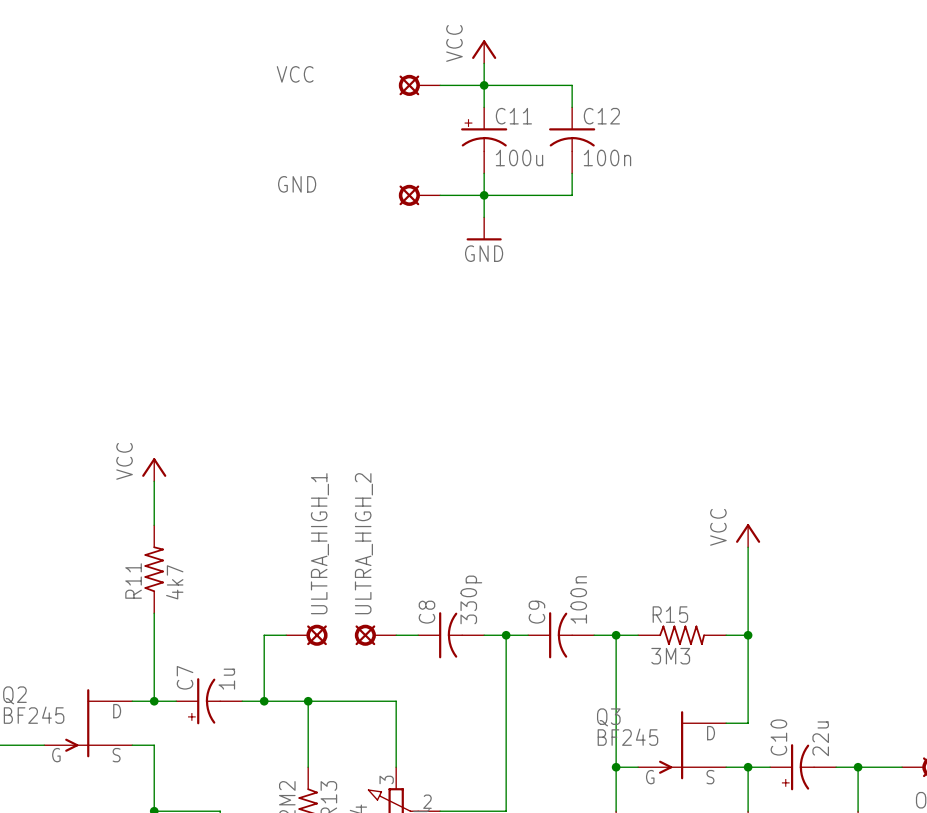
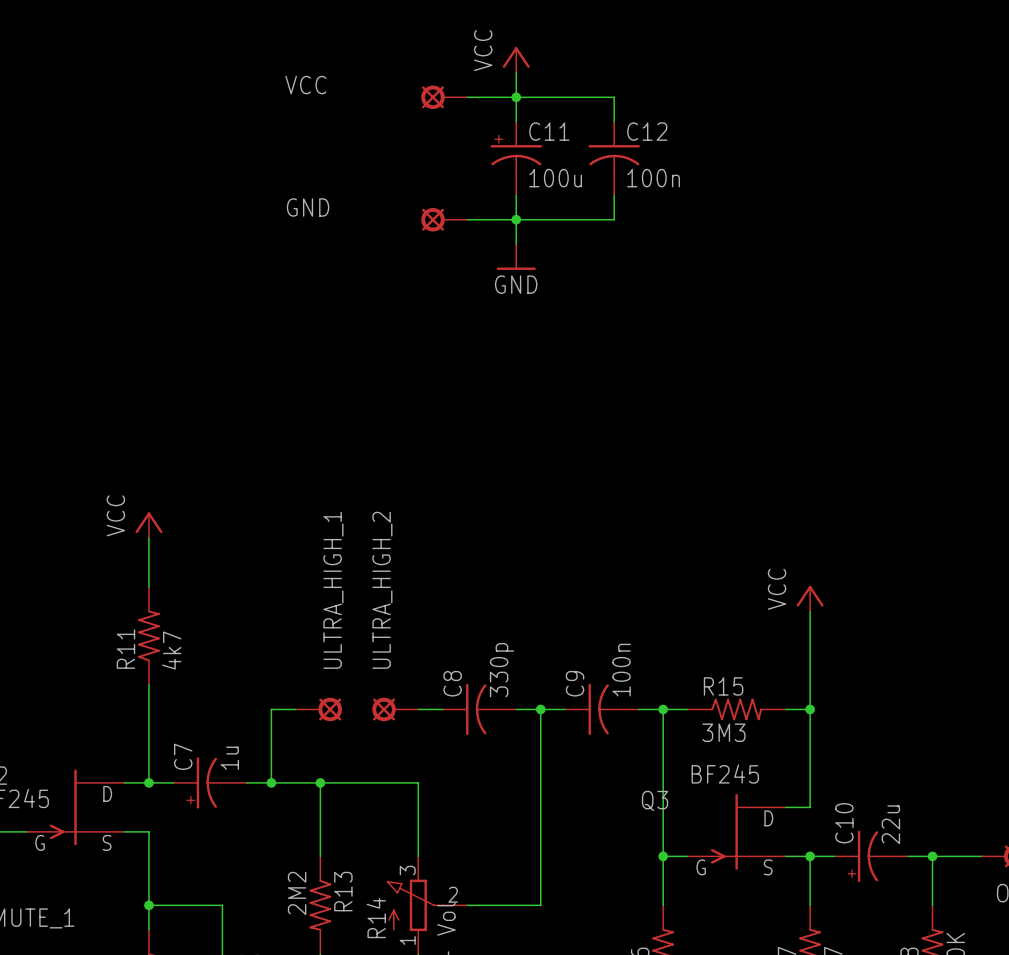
ULTRA_HIGH_1 name position: ULTRA_HIGH_1 (319, 543) -> ULTRA_HIGH_1 (333, 590)
ULTRA_HIGH_2 name position: ULTRA_HIGH_2 (363, 543) -> ULTRA_HIGH_2 (382, 590)
Q3 value position: BF245 (627, 737) -> BF245 (725, 773)

